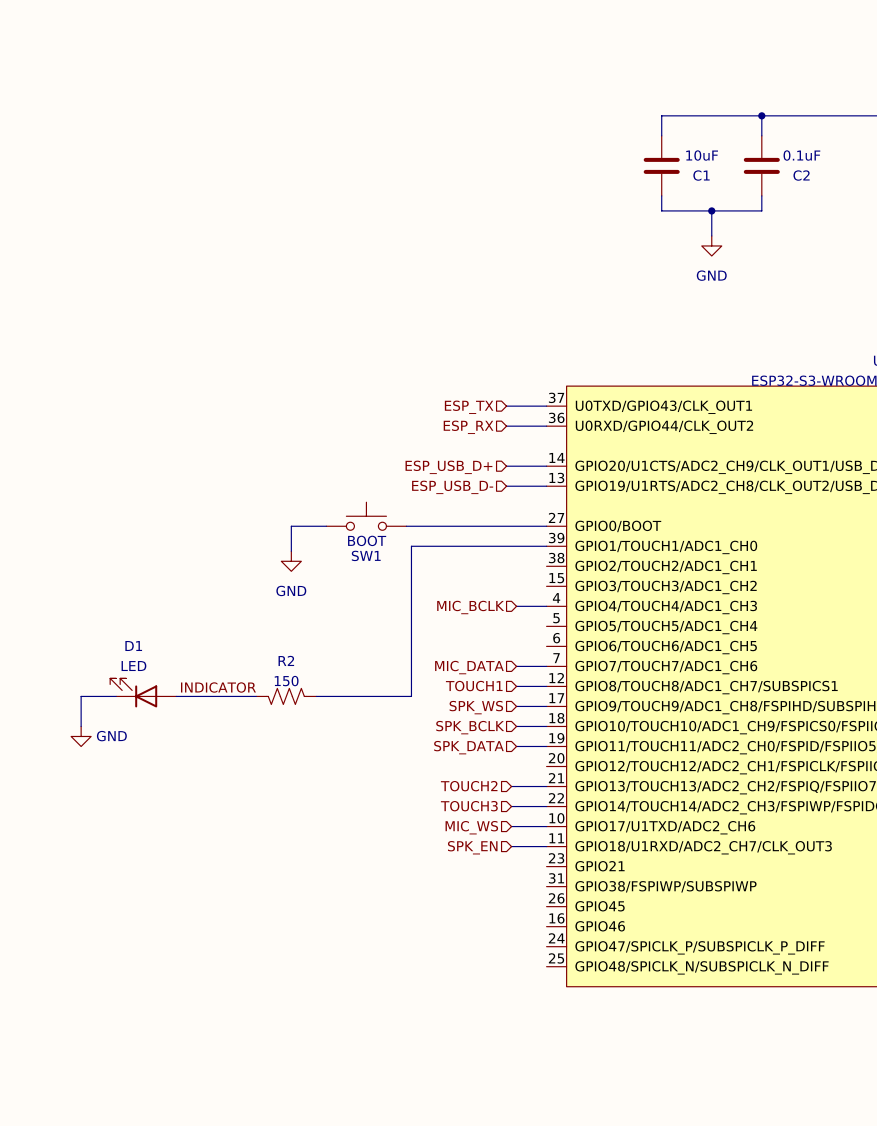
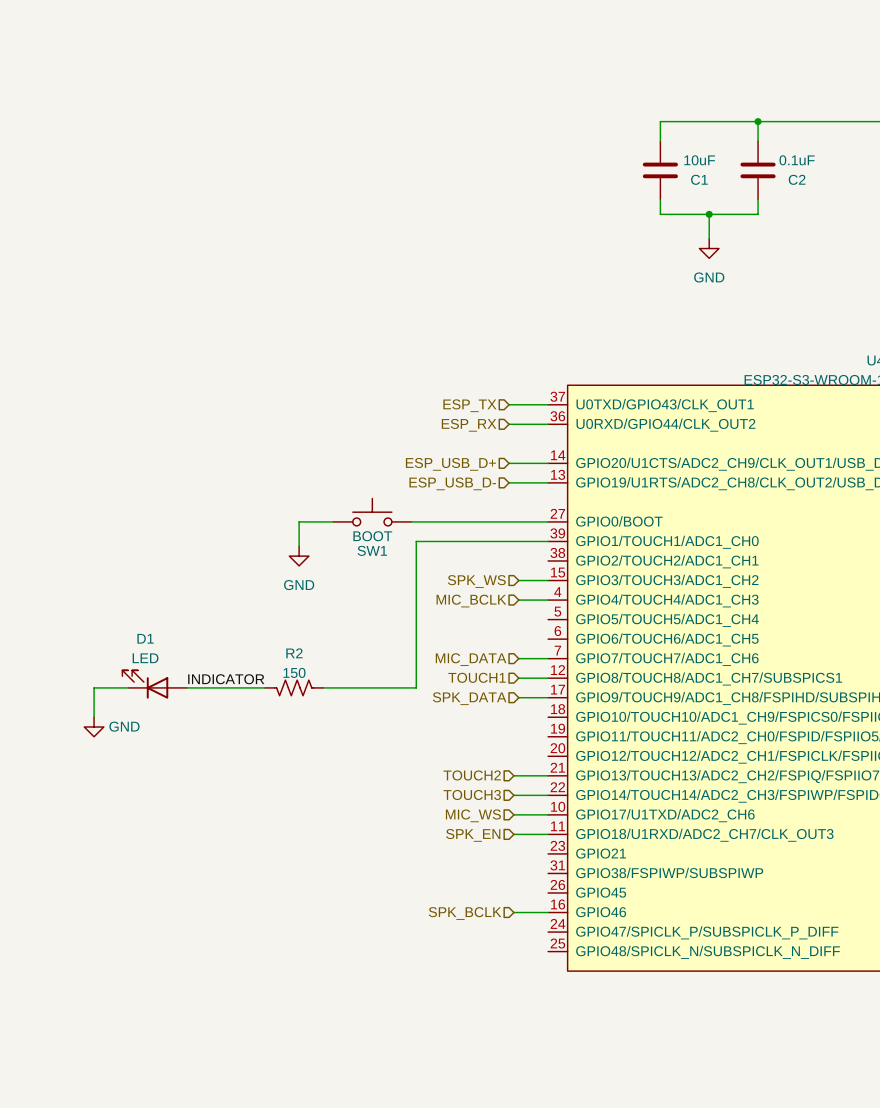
hierarchical label: none -> SPK_WS (476, 581)
hierarchical label: SPK_WS (476, 707) -> SPK_DATA (469, 698)
wire: (516, 726) (546, 726) -> (518, 580) (548, 580)
hierarchical label: SPK_BCLK (470, 727) -> none
wire: (516, 746) (546, 746) -> none
hierarchical label: SPK_DATA (468, 747) -> none
wire: none -> (513, 912) (548, 912)
hierarchical label: none -> SPK_BCLK (465, 913)

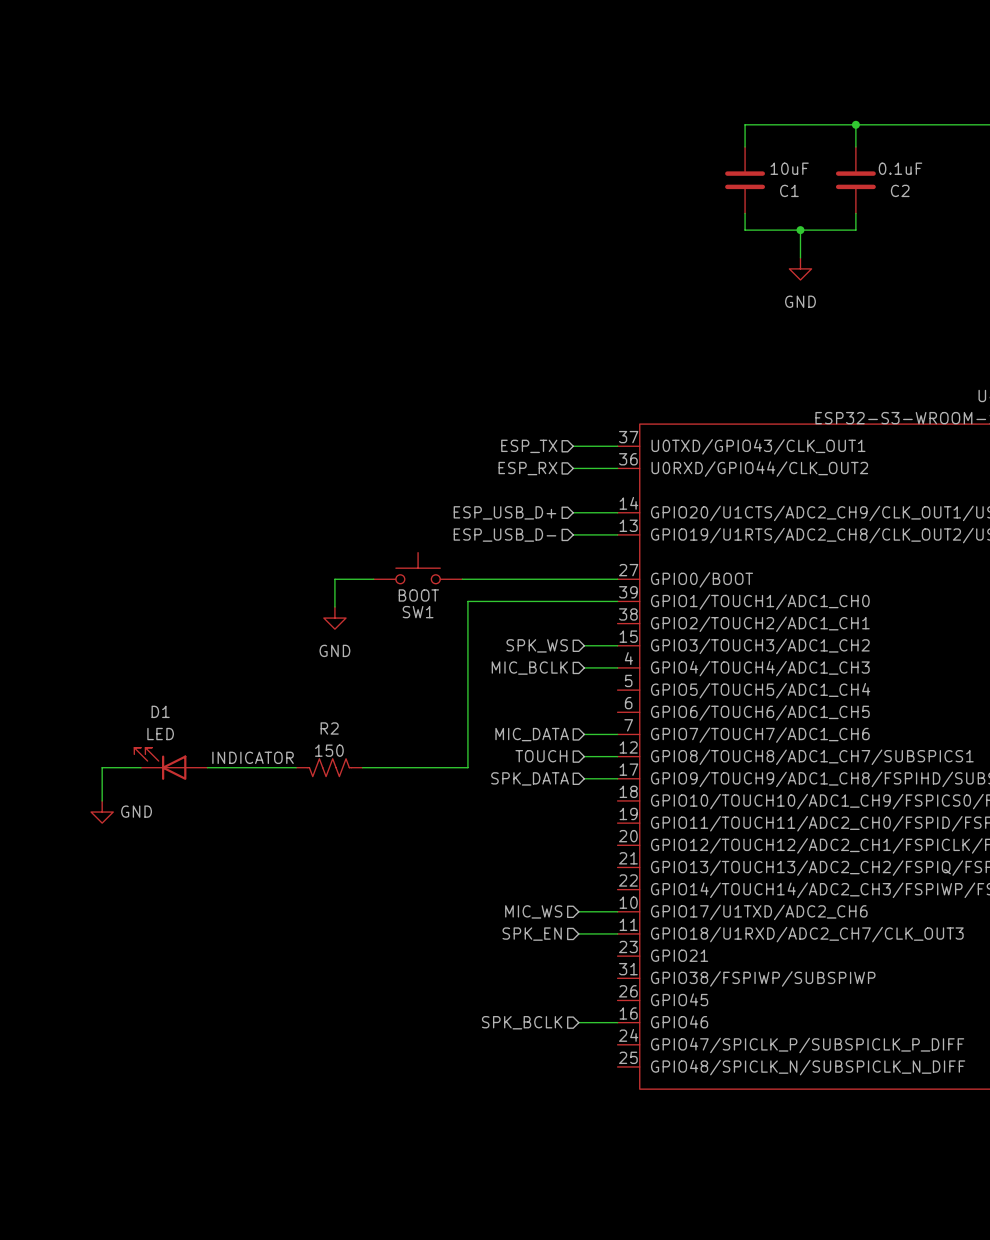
hierarchical label: TOUCH1 (477, 677) -> TOUCH (541, 756)
hierarchical label: TOUCH2 (472, 775) -> none
wire: (513, 775) (548, 775) -> none
hierarchical label: TOUCH3 (472, 794) -> none
wire: (513, 795) (548, 795) -> none

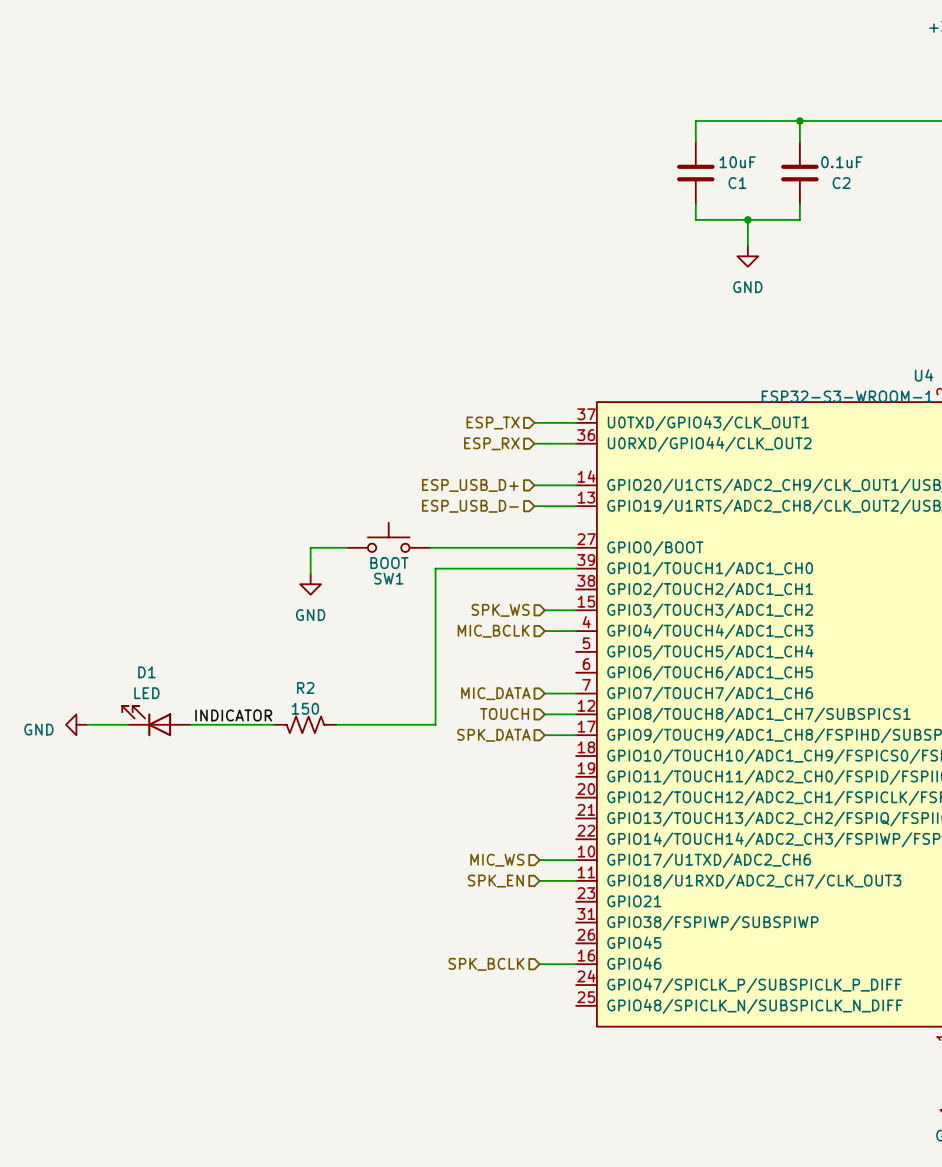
wire: (102, 767) (102, 800) -> (92, 724) (86, 724)
power symbol text position: GND (136, 811) -> GND (38, 729)
power symbol rotation: 0° (102, 812) -> 90° clockwise (76, 724)
power symbol position: GND (102, 812) -> GND (76, 724)

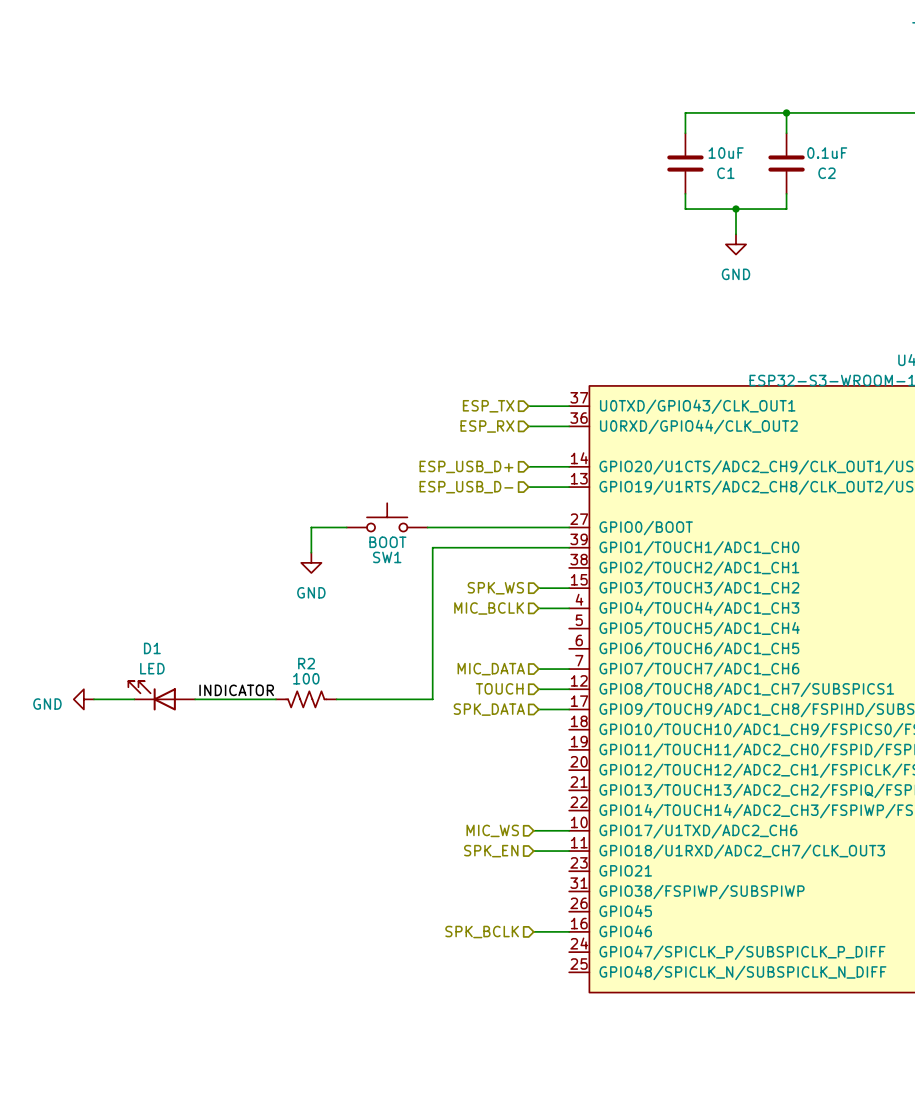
R2 value: 150 (305, 708) -> 100 (306, 678)

